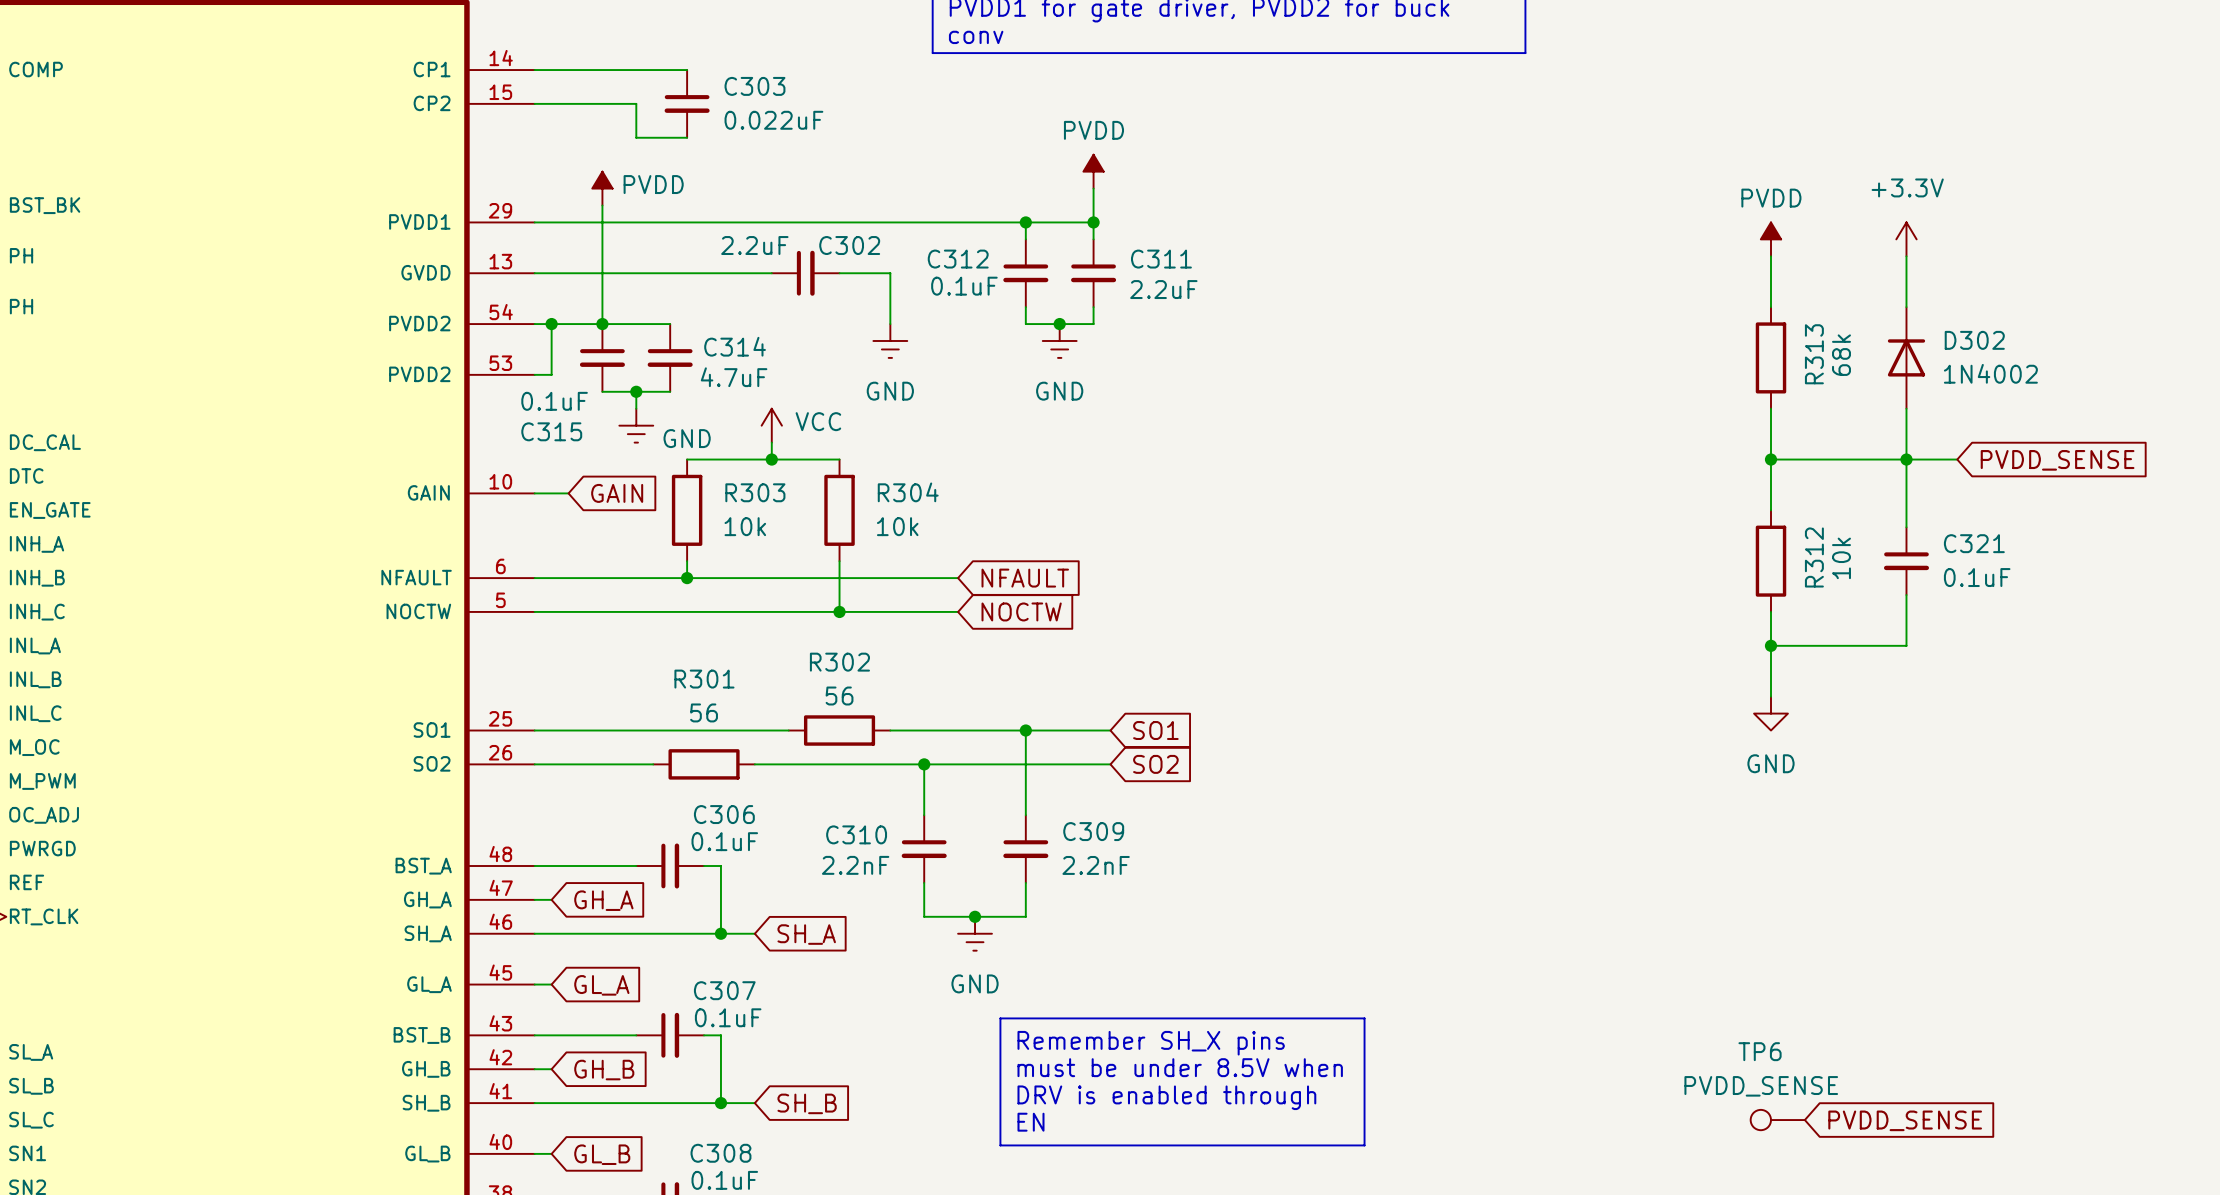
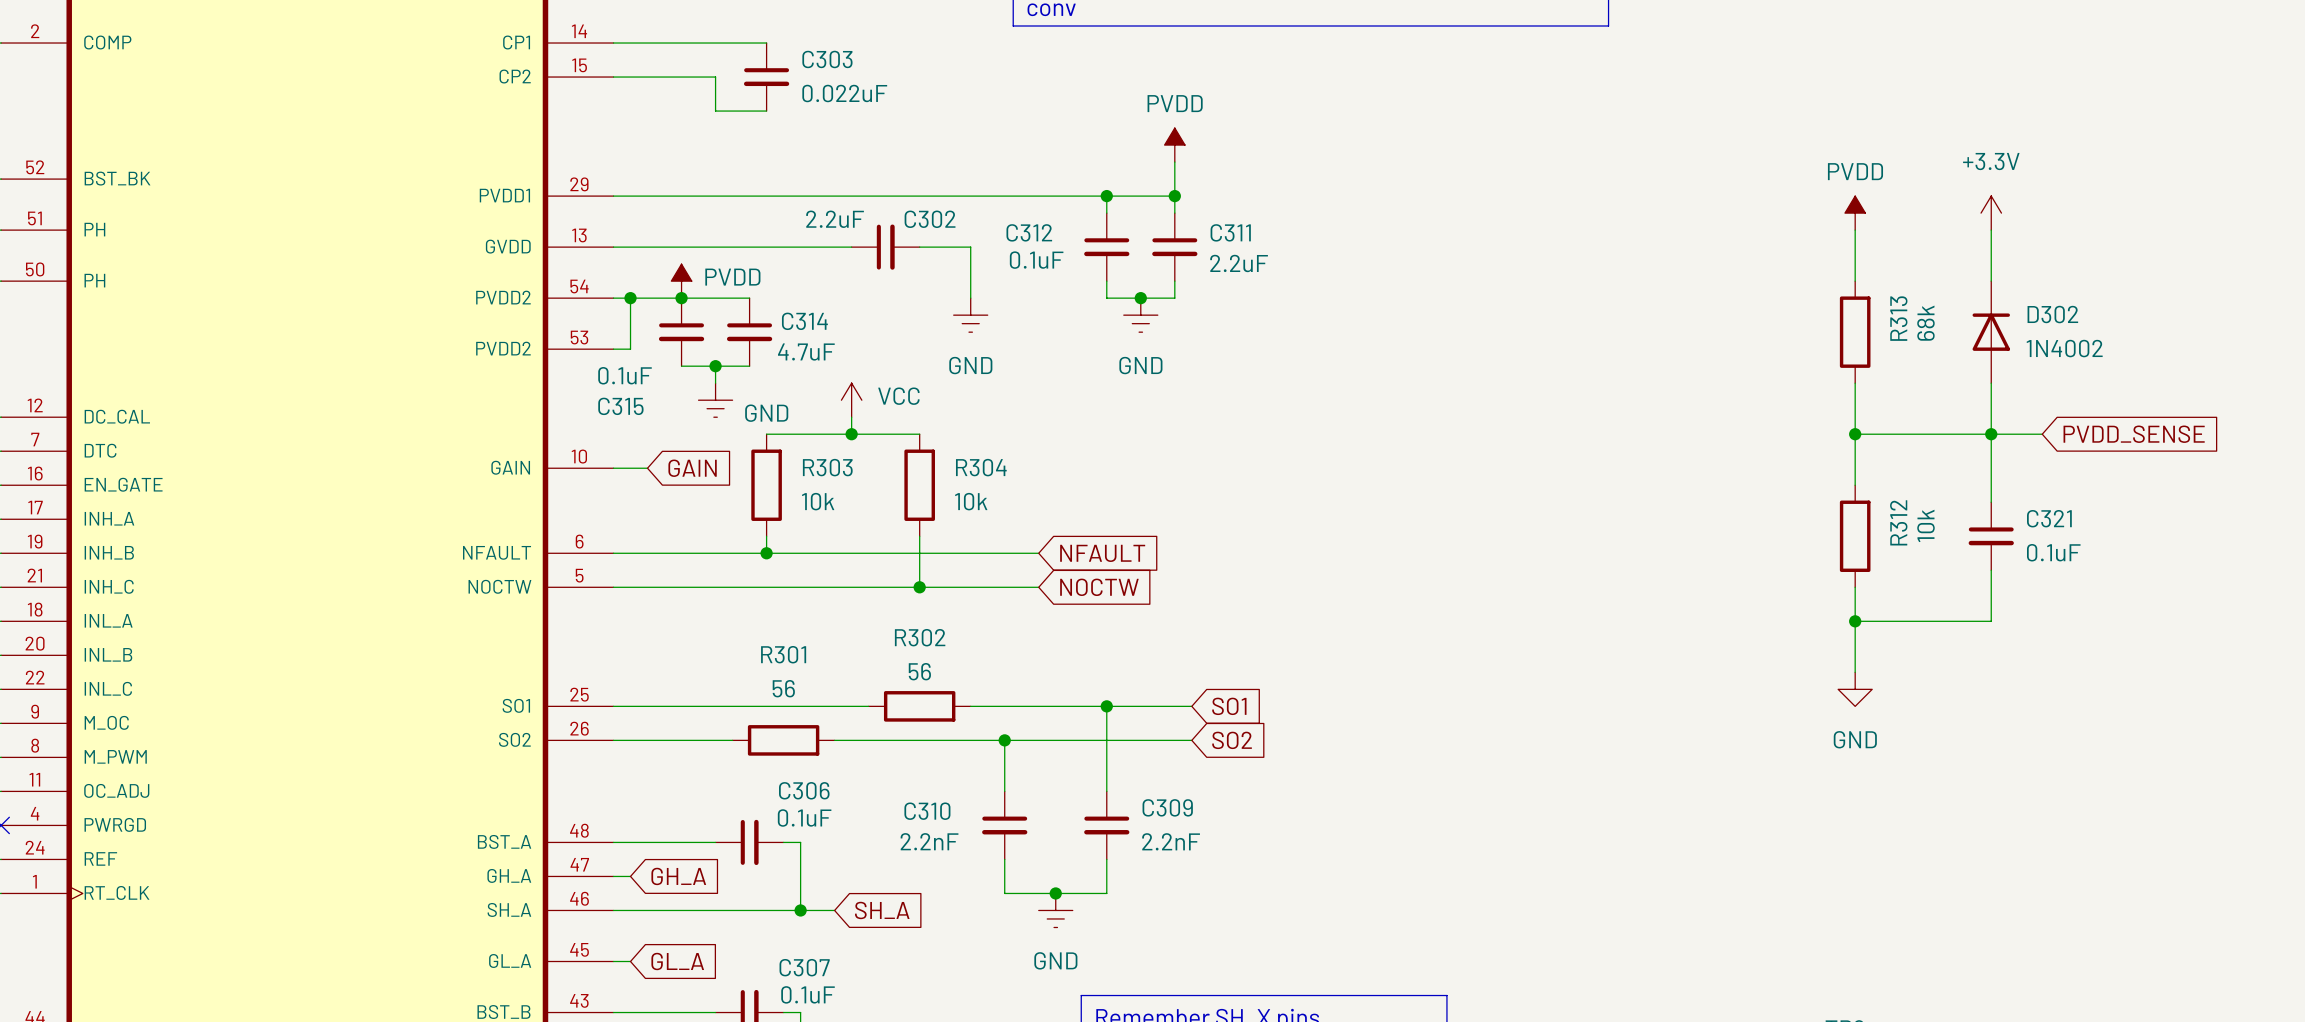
power symbol position: PVDD (602, 188) -> PVDD (681, 281)
wire: (602, 205) (602, 324) -> none

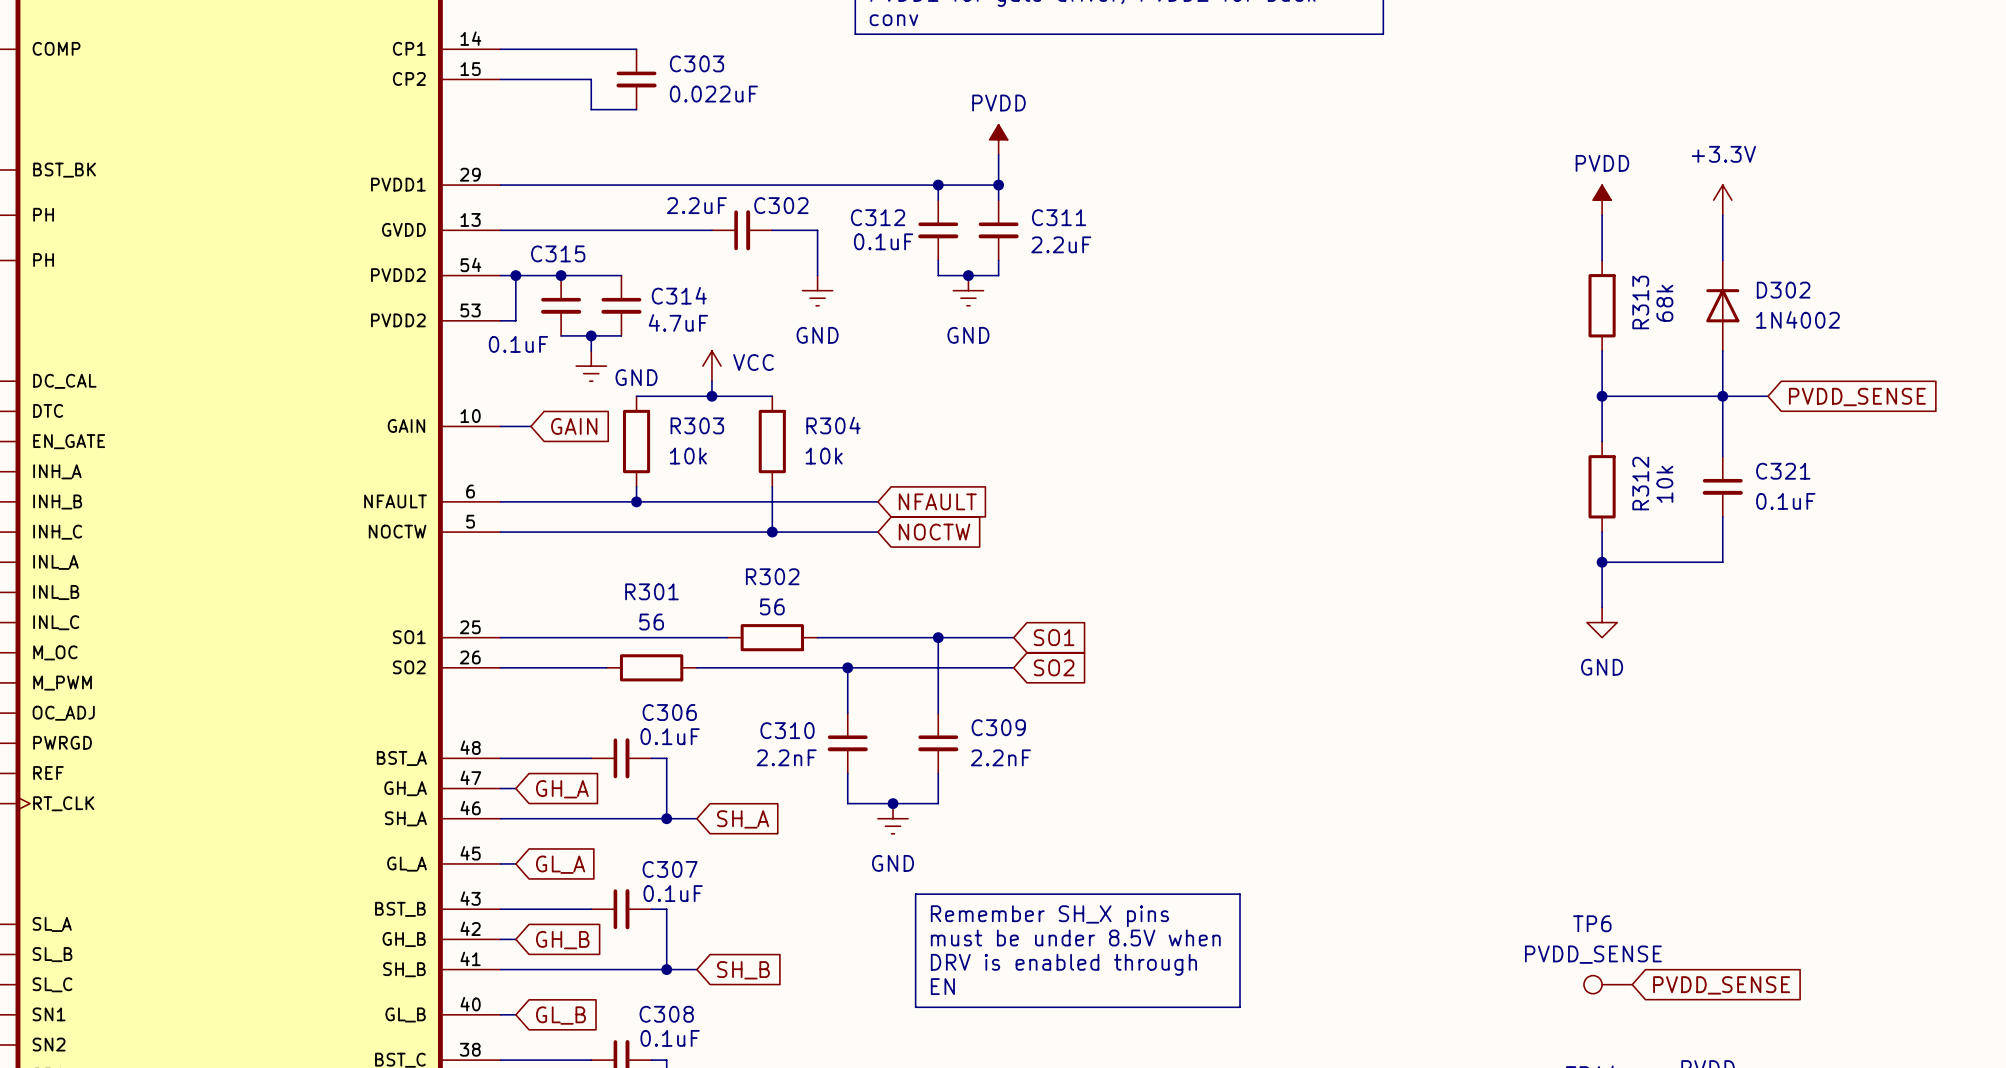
power symbol: PVDD (681, 281) -> none
C315 name position: C315 (620, 406) -> C315 (558, 253)

